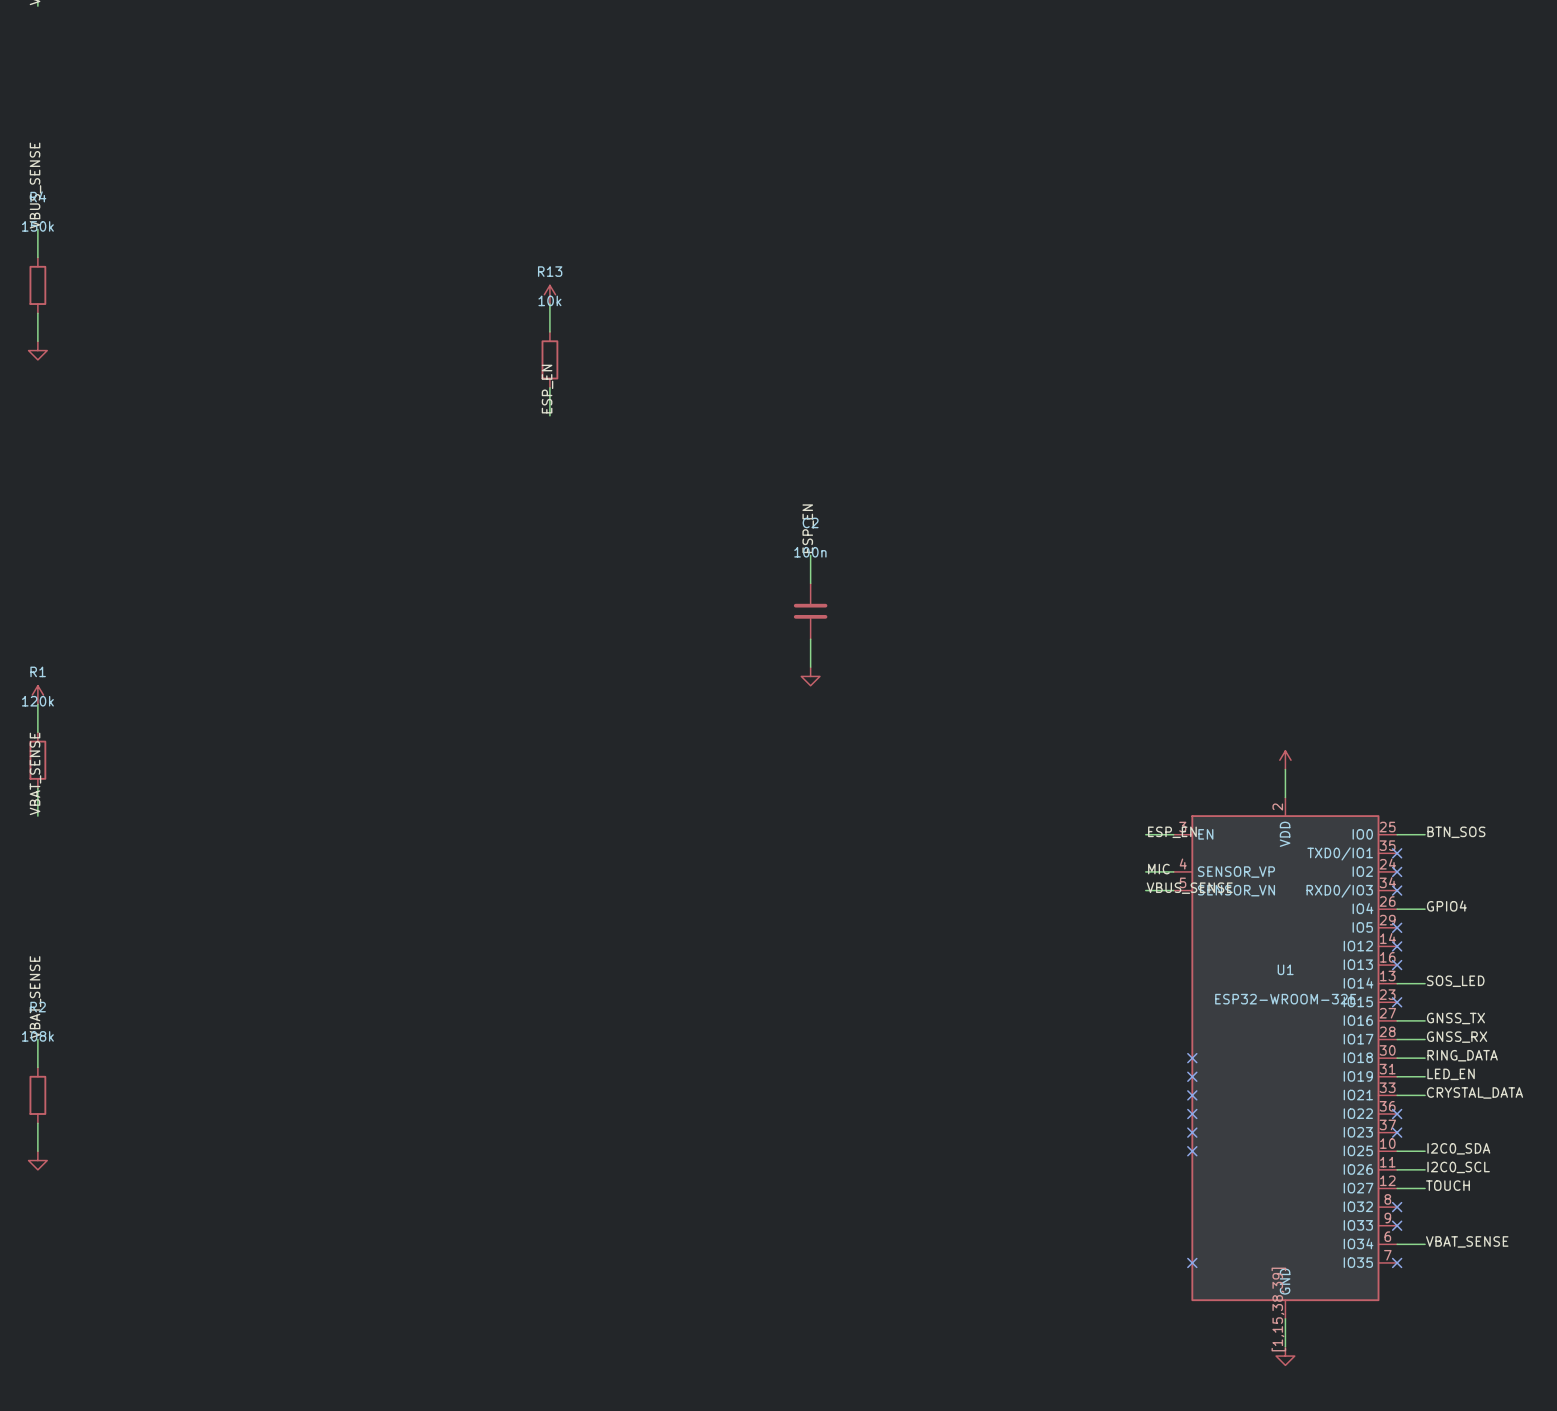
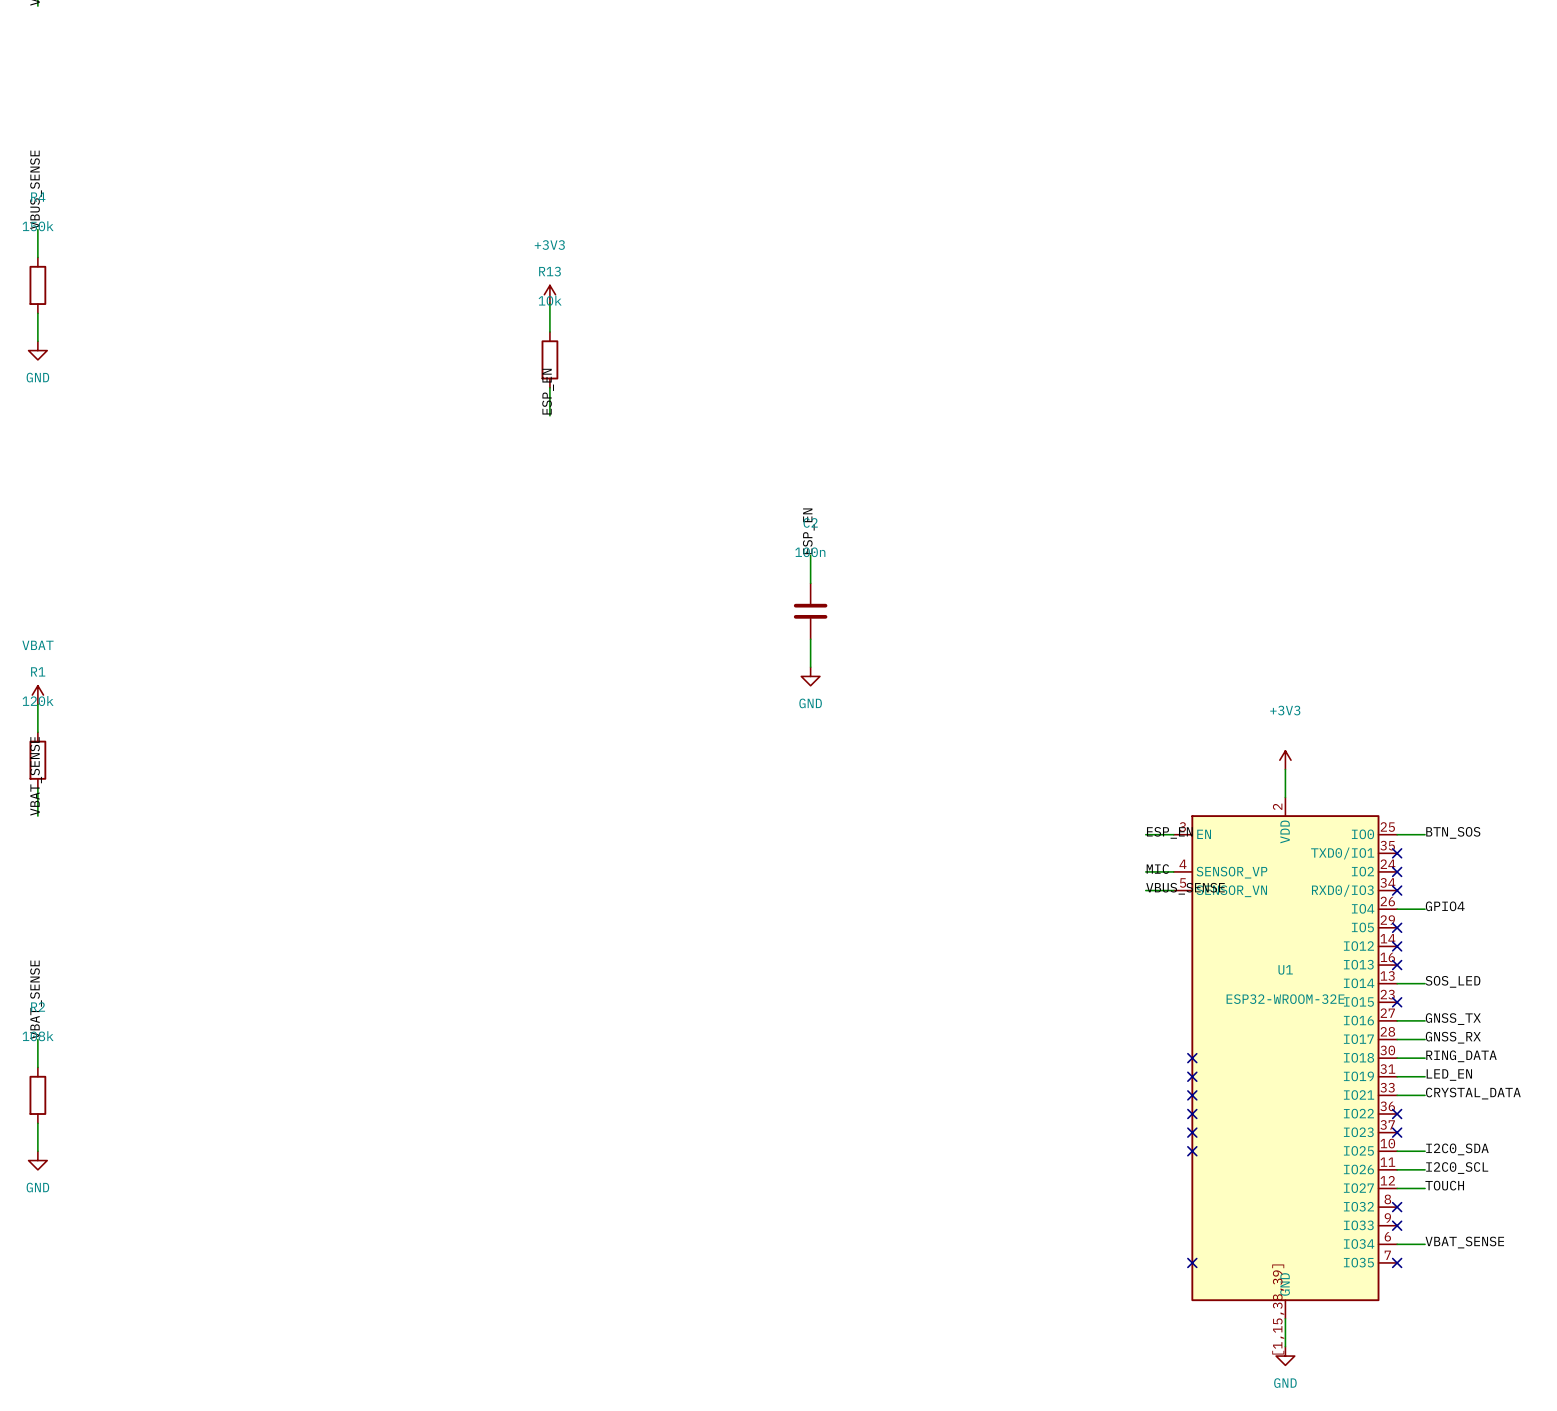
power symbol text: none -> +3V3 (549, 245)
power symbol text: none -> GND (37, 377)
power symbol text: none -> VBAT (37, 645)
power symbol text: none -> GND (810, 703)
power symbol text: none -> +3V3 (1285, 710)
power symbol text: none -> GND (37, 1187)
power symbol text: none -> GND (1285, 1383)

